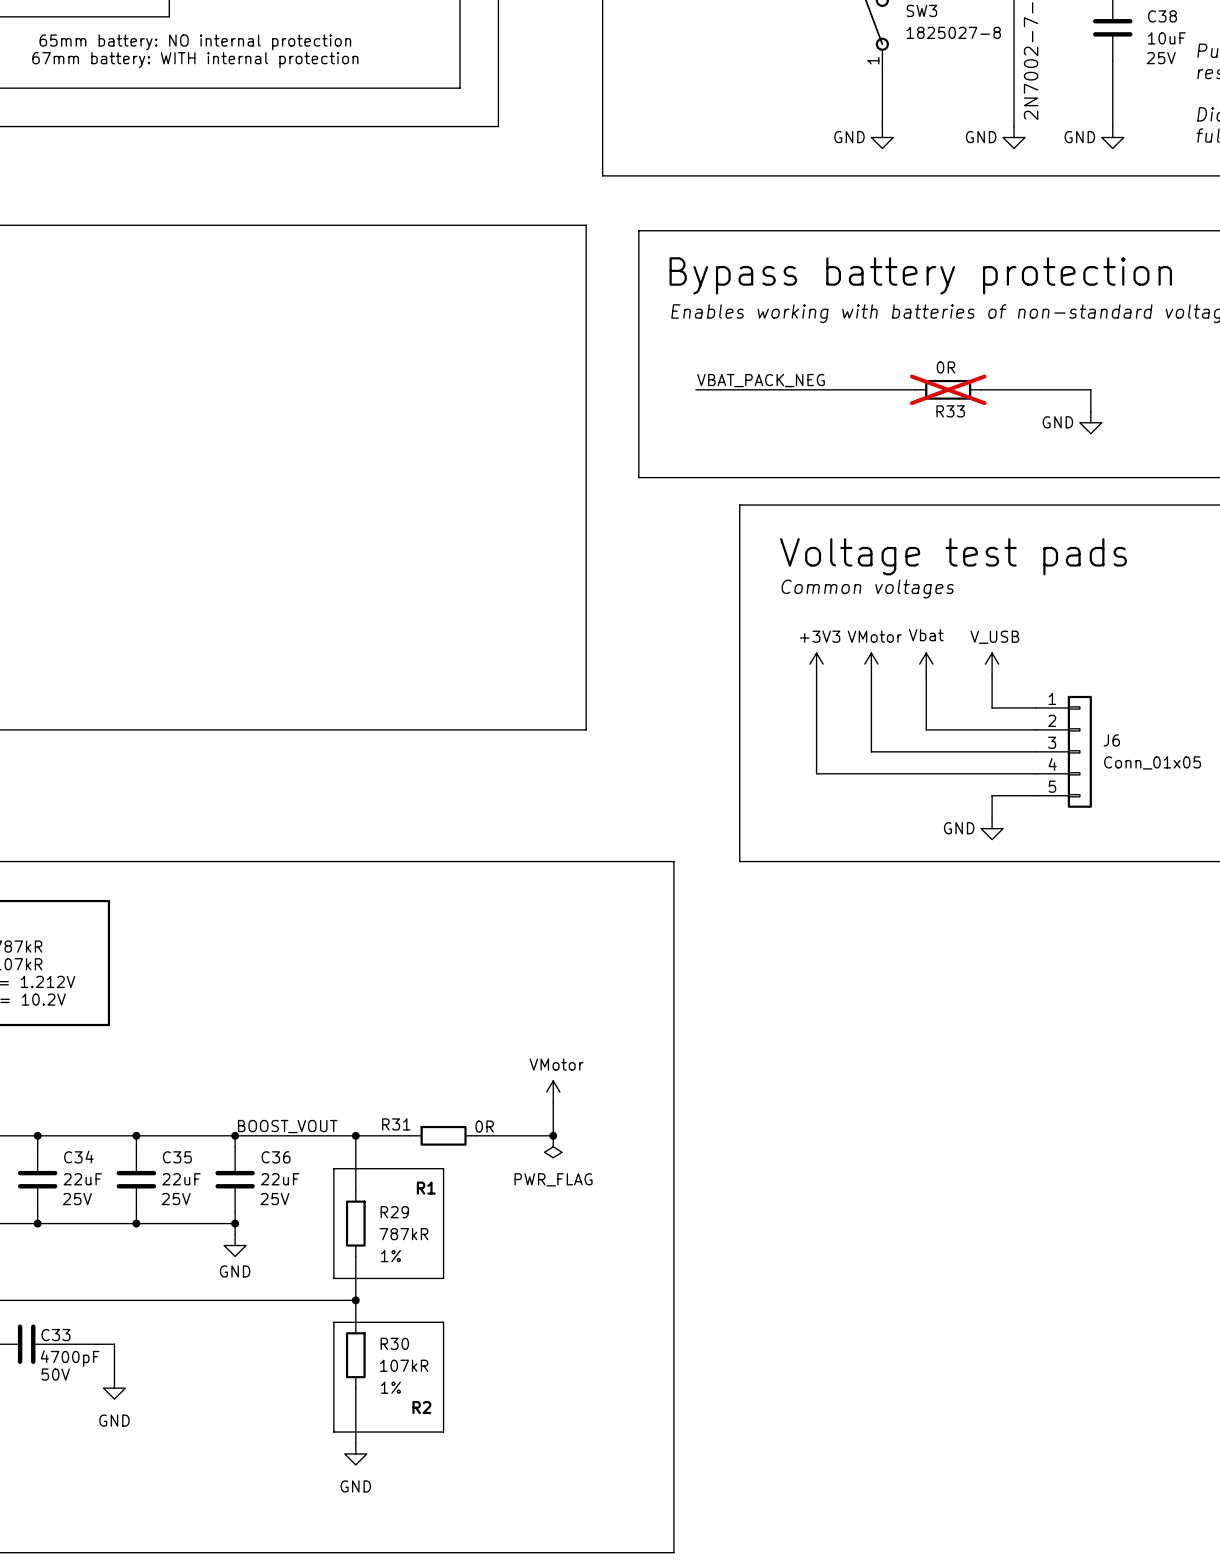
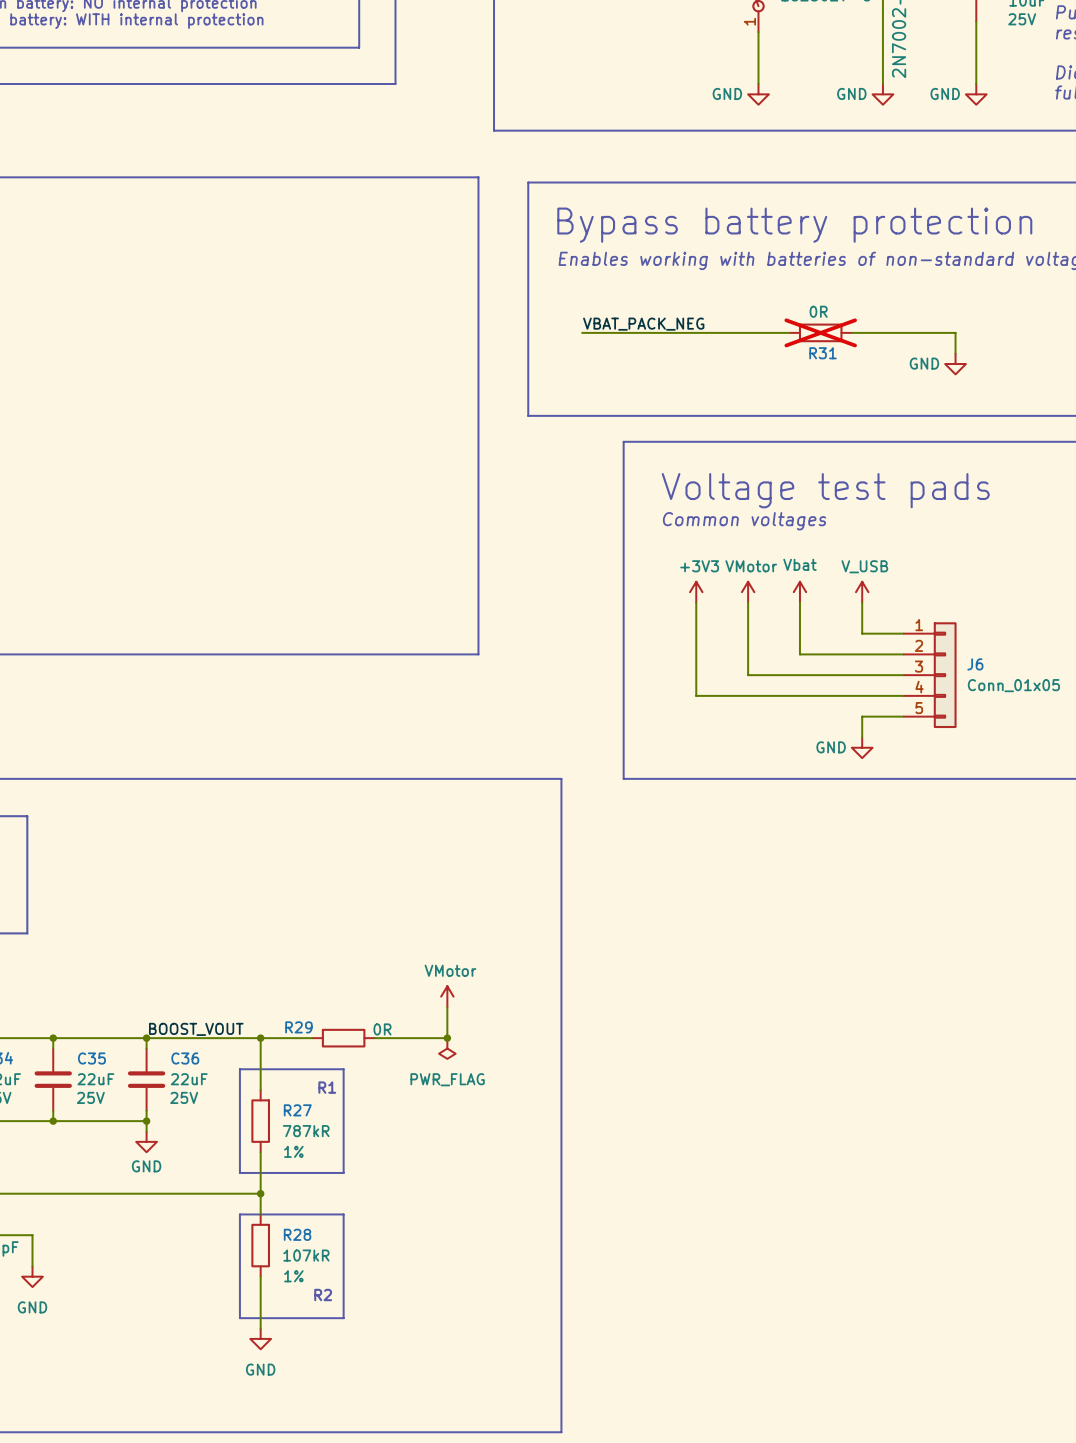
R33 name: R33 (950, 411) -> R31 (823, 353)
R31 name: R31 (396, 1124) -> R29 (298, 1027)
R29 name: R29 (394, 1212) -> R27 (297, 1110)
R30 name: R30 (394, 1343) -> R28 (297, 1234)

